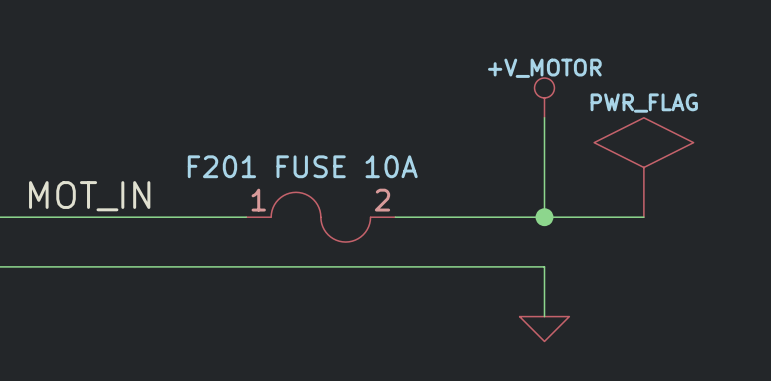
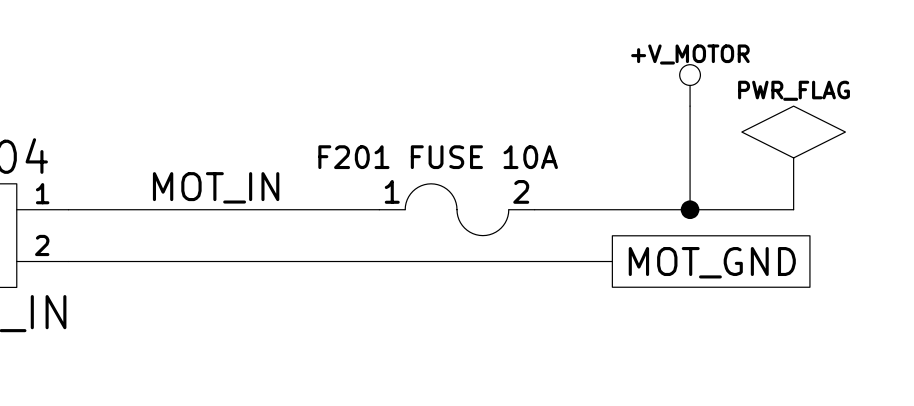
wire: (469, 266) (544, 266) (544, 316) -> none
global label: none -> MOT_GND (712, 262)
power symbol: (544, 329) -> none

